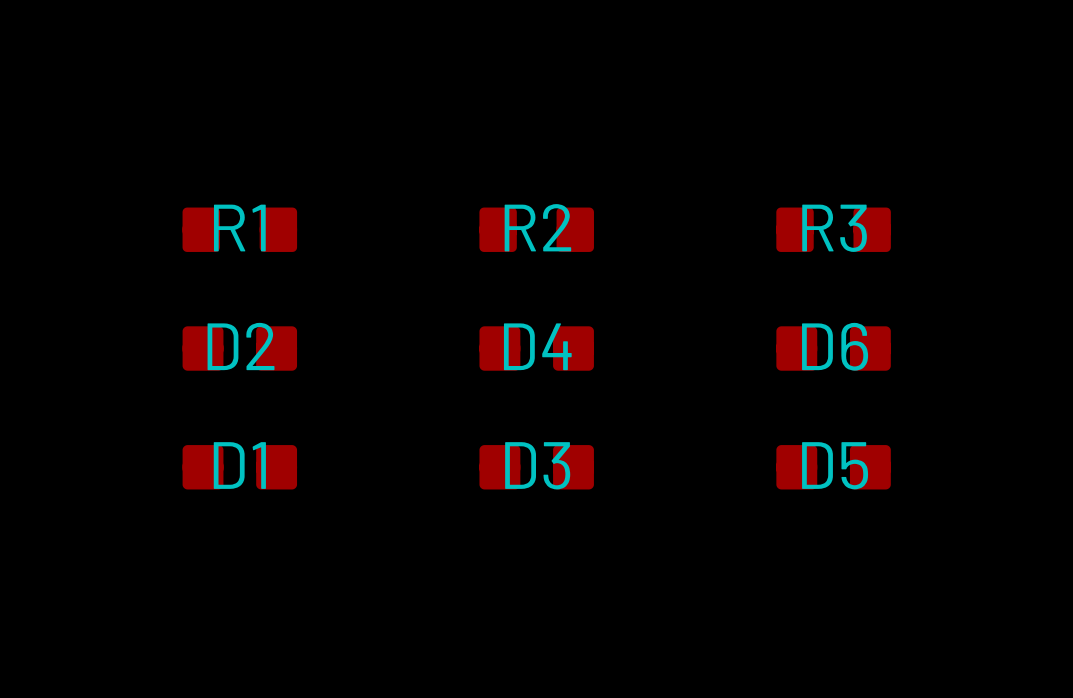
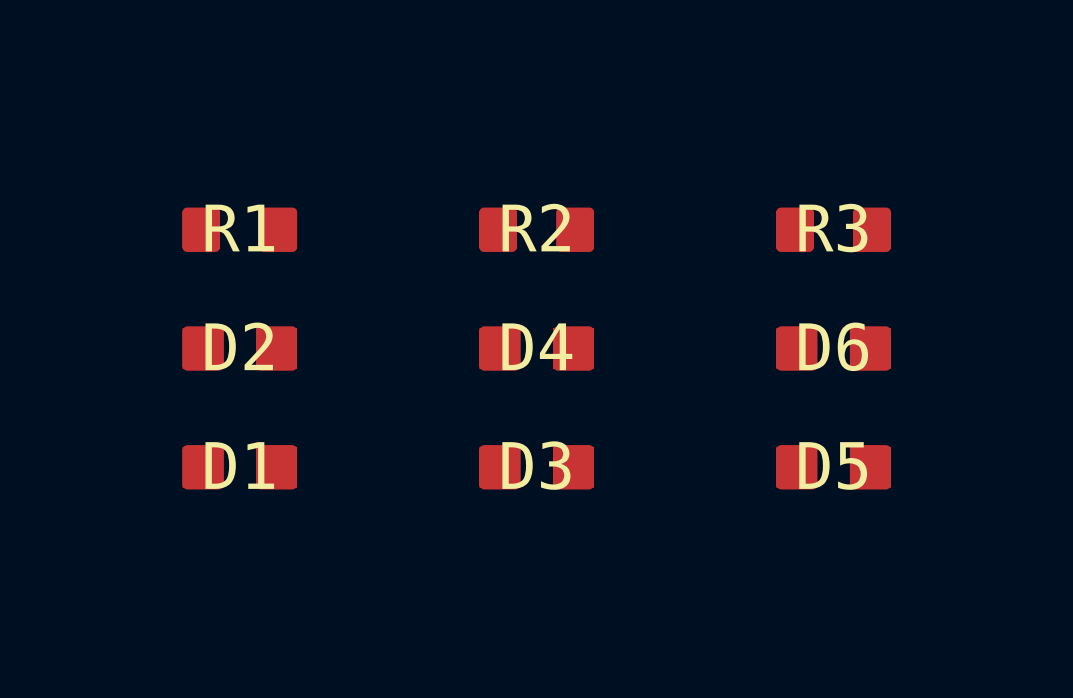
R1 footprint: [182, 207, 298, 252] -> [182, 207, 298, 252]
R2 footprint: [479, 207, 594, 252] -> [479, 207, 594, 252]
R3 footprint: [776, 207, 891, 252] -> [776, 207, 891, 252]
D2 footprint: [182, 326, 298, 371] -> [182, 326, 298, 371]
D4 footprint: [479, 326, 594, 371] -> [479, 326, 594, 371]
D6 footprint: [776, 326, 891, 371] -> [776, 326, 891, 371]
D1 footprint: [182, 445, 298, 490] -> [182, 445, 298, 490]
D3 footprint: [479, 445, 594, 490] -> [479, 445, 594, 490]
D5 footprint: [776, 445, 891, 490] -> [776, 445, 891, 490]

